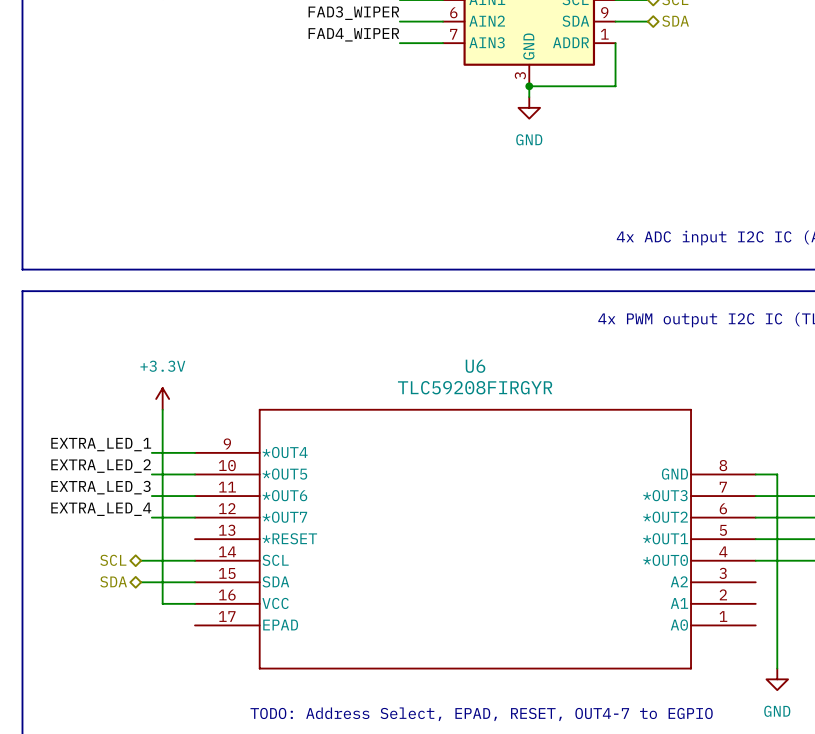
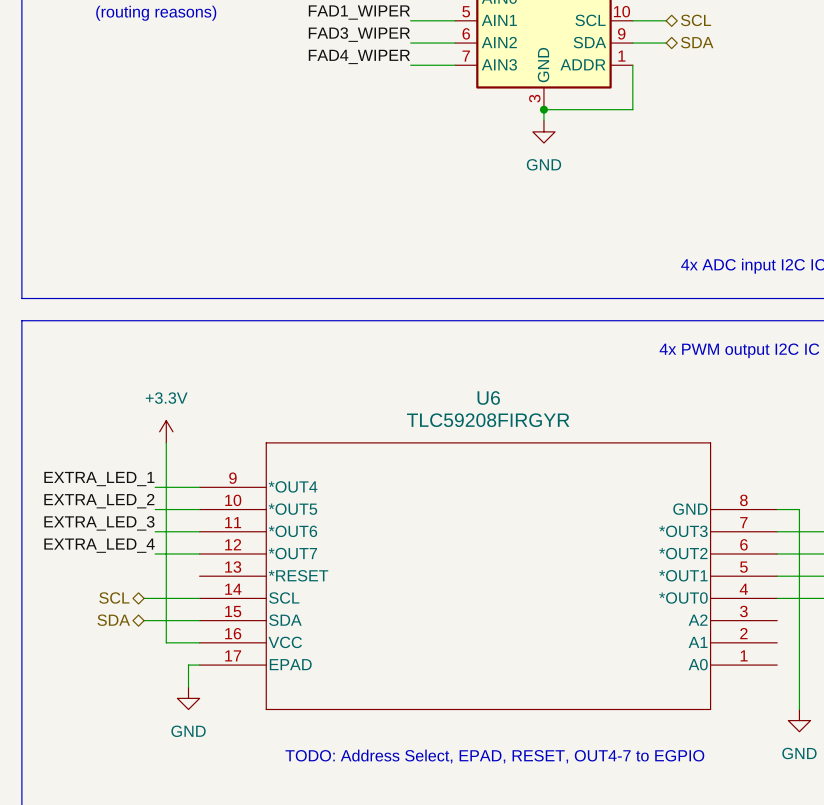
wire: none -> (199, 665) (188, 665) (188, 687)
power symbol: none -> GND (188, 698)

